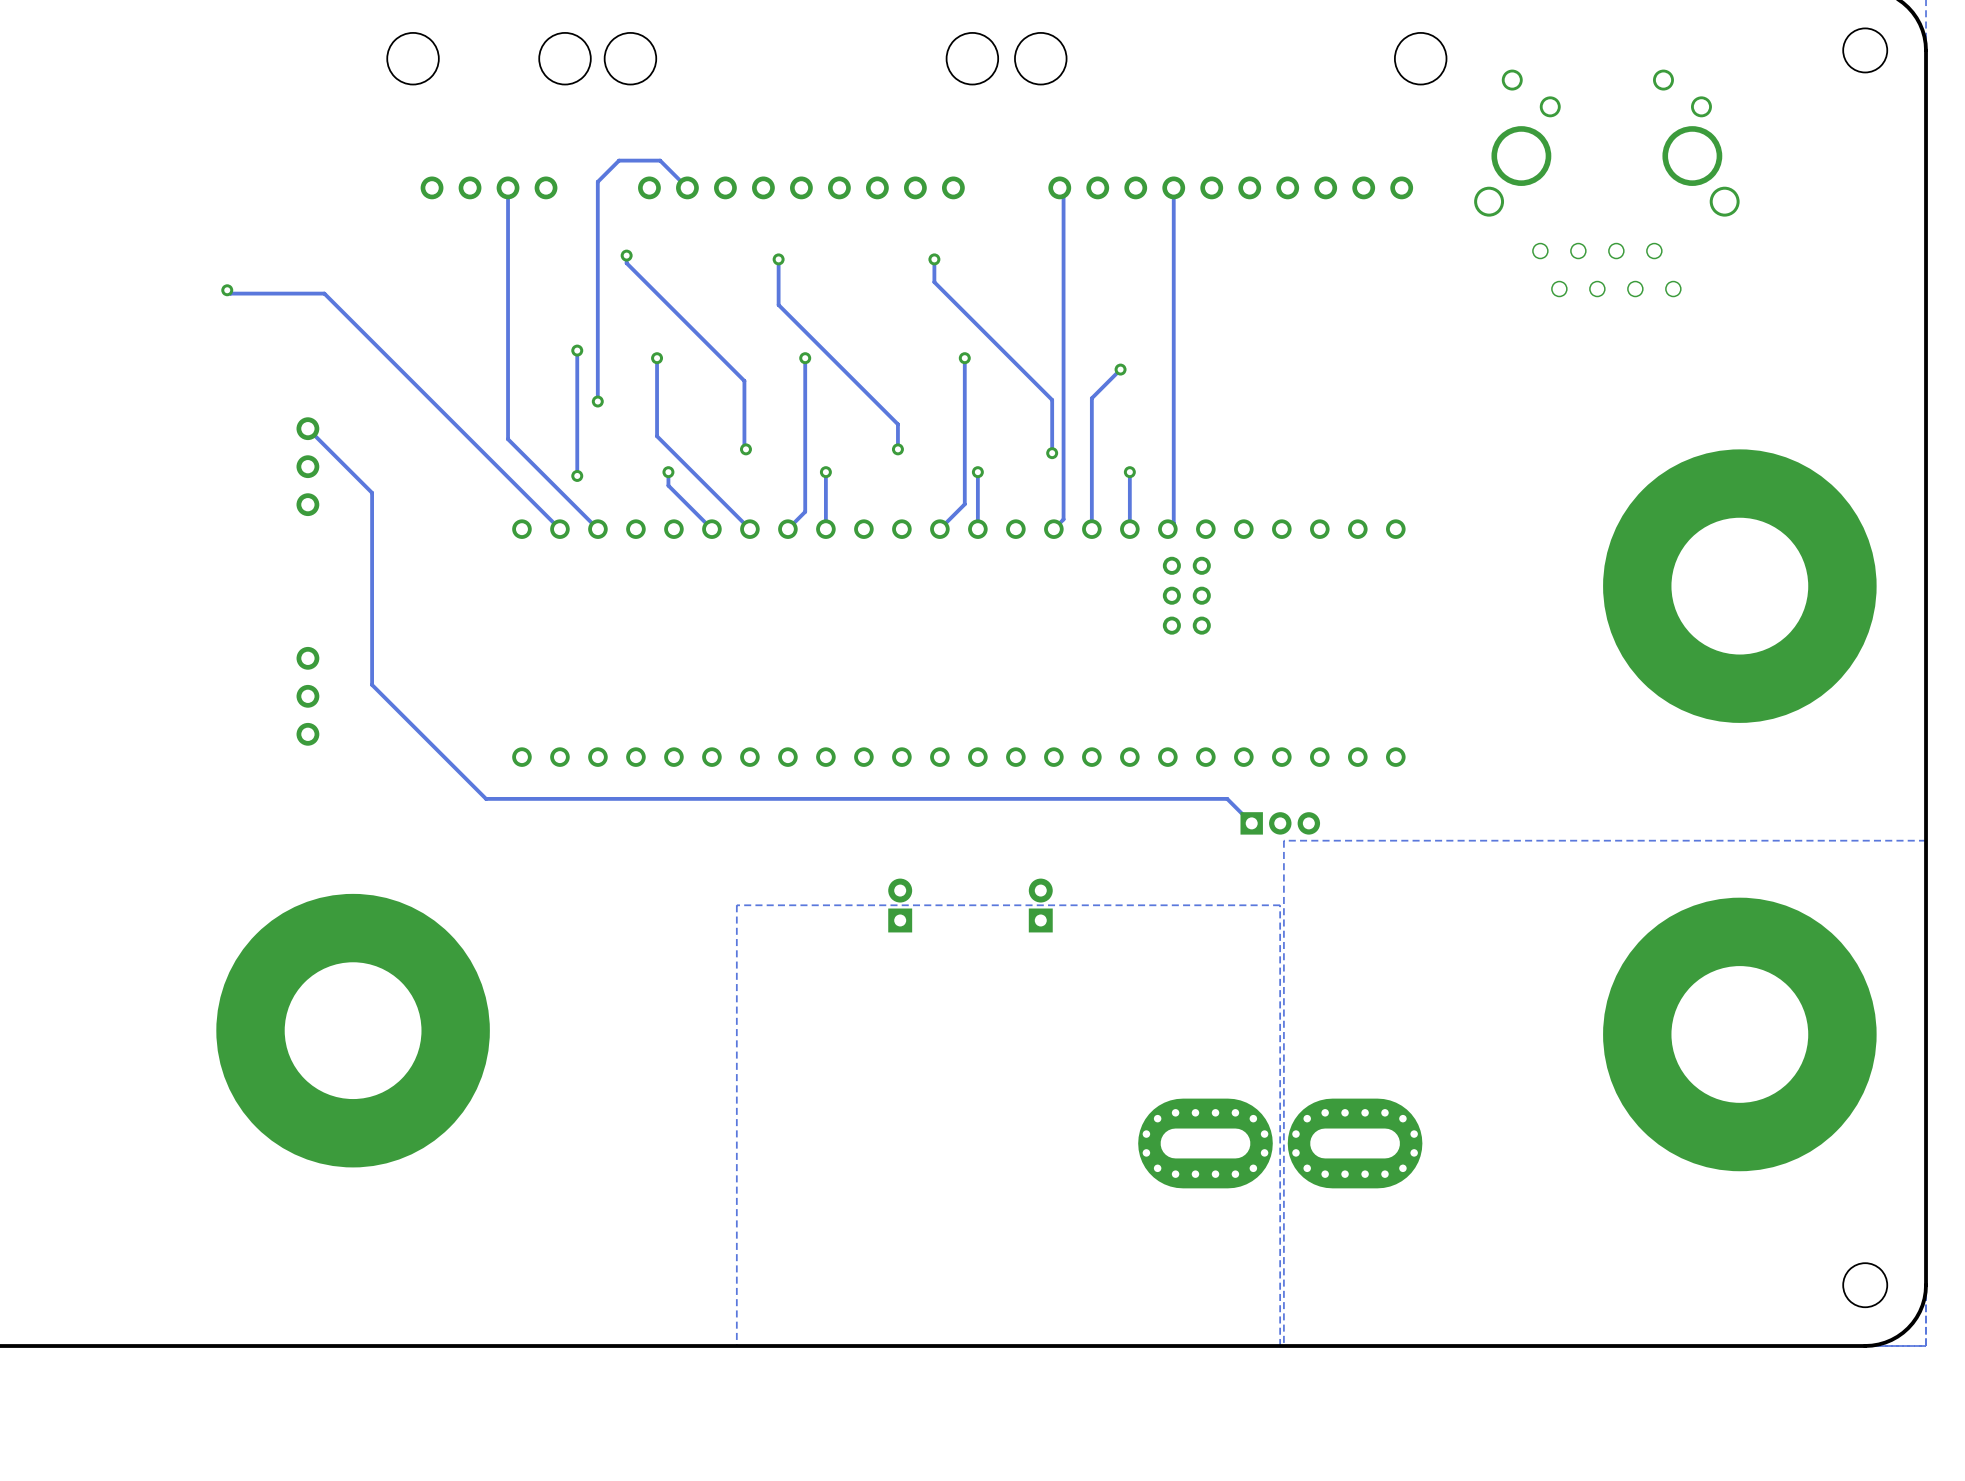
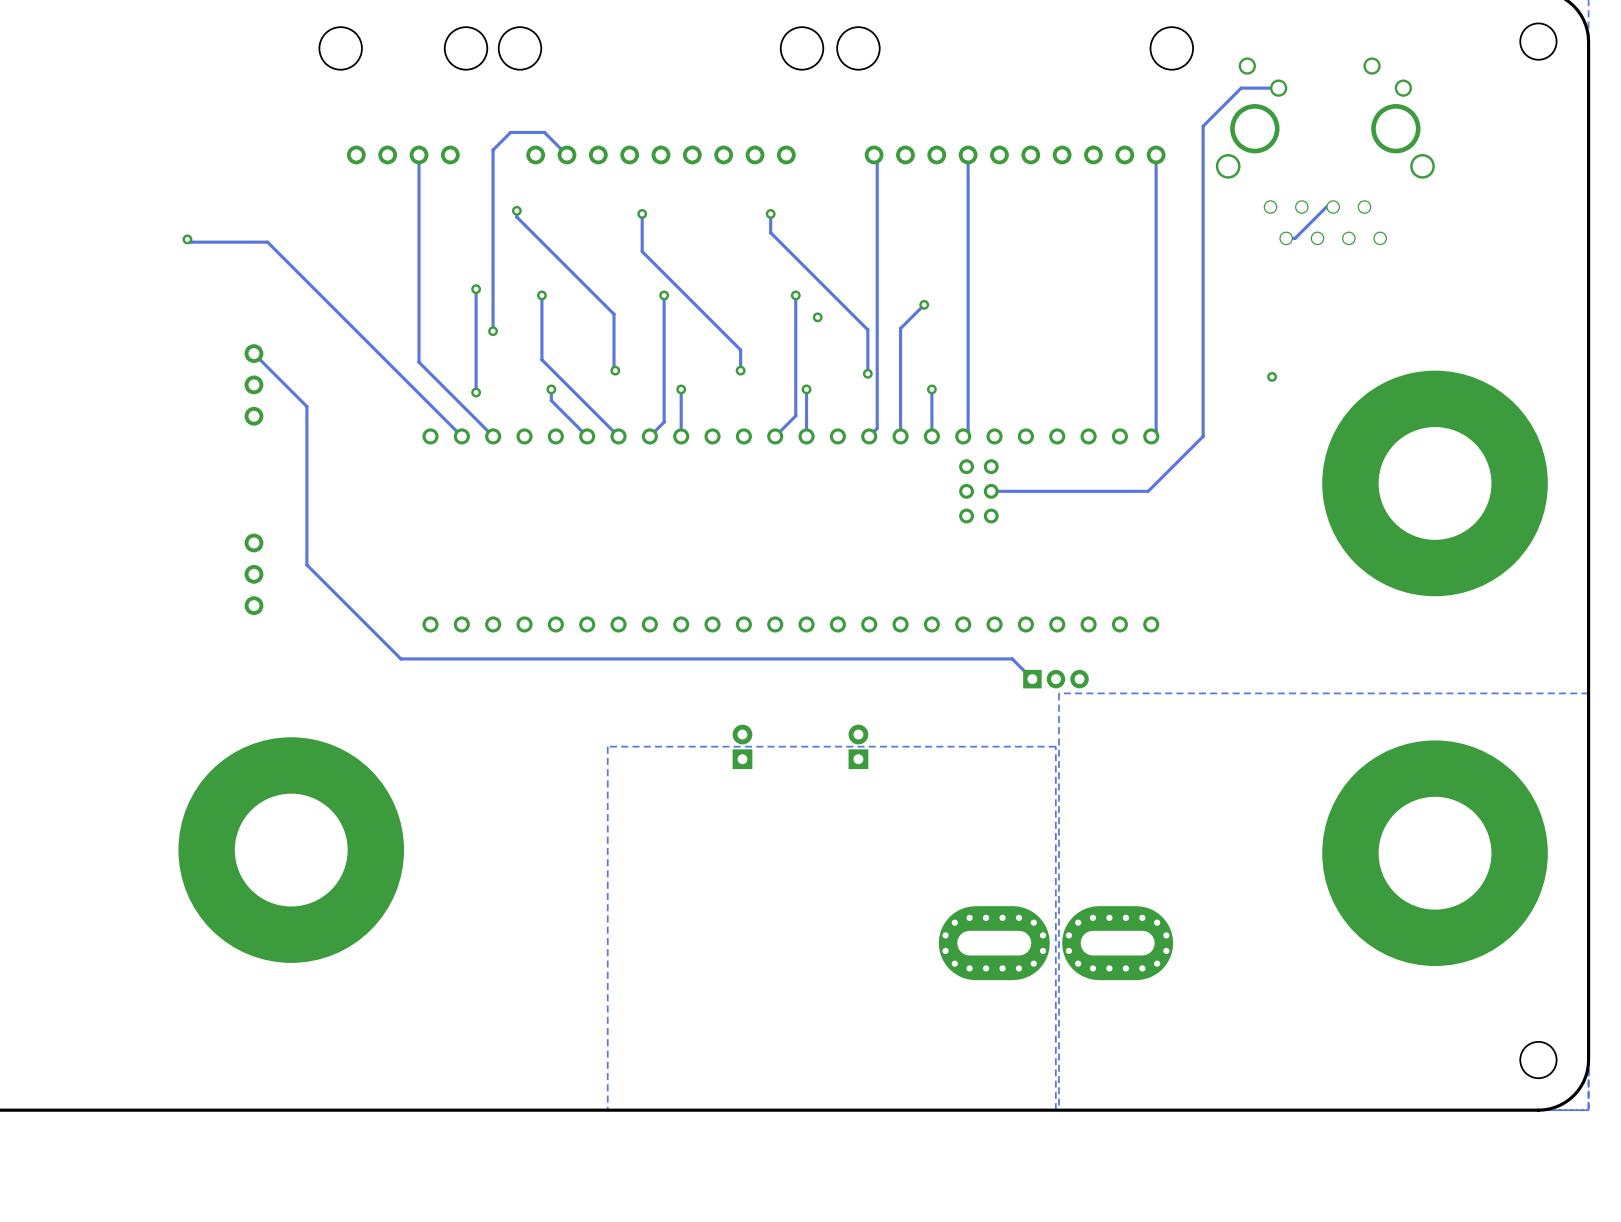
track: none -> (1278, 88) (1241, 88) (1203, 126) (1203, 436) (1148, 491) (991, 491)
track: none -> (1156, 154) (1156, 431) (1151, 436)
track: none -> (1333, 207) (1326, 207) (1295, 238) (1286, 238)
via: none -> (817, 317)
via: none -> (1272, 376)

